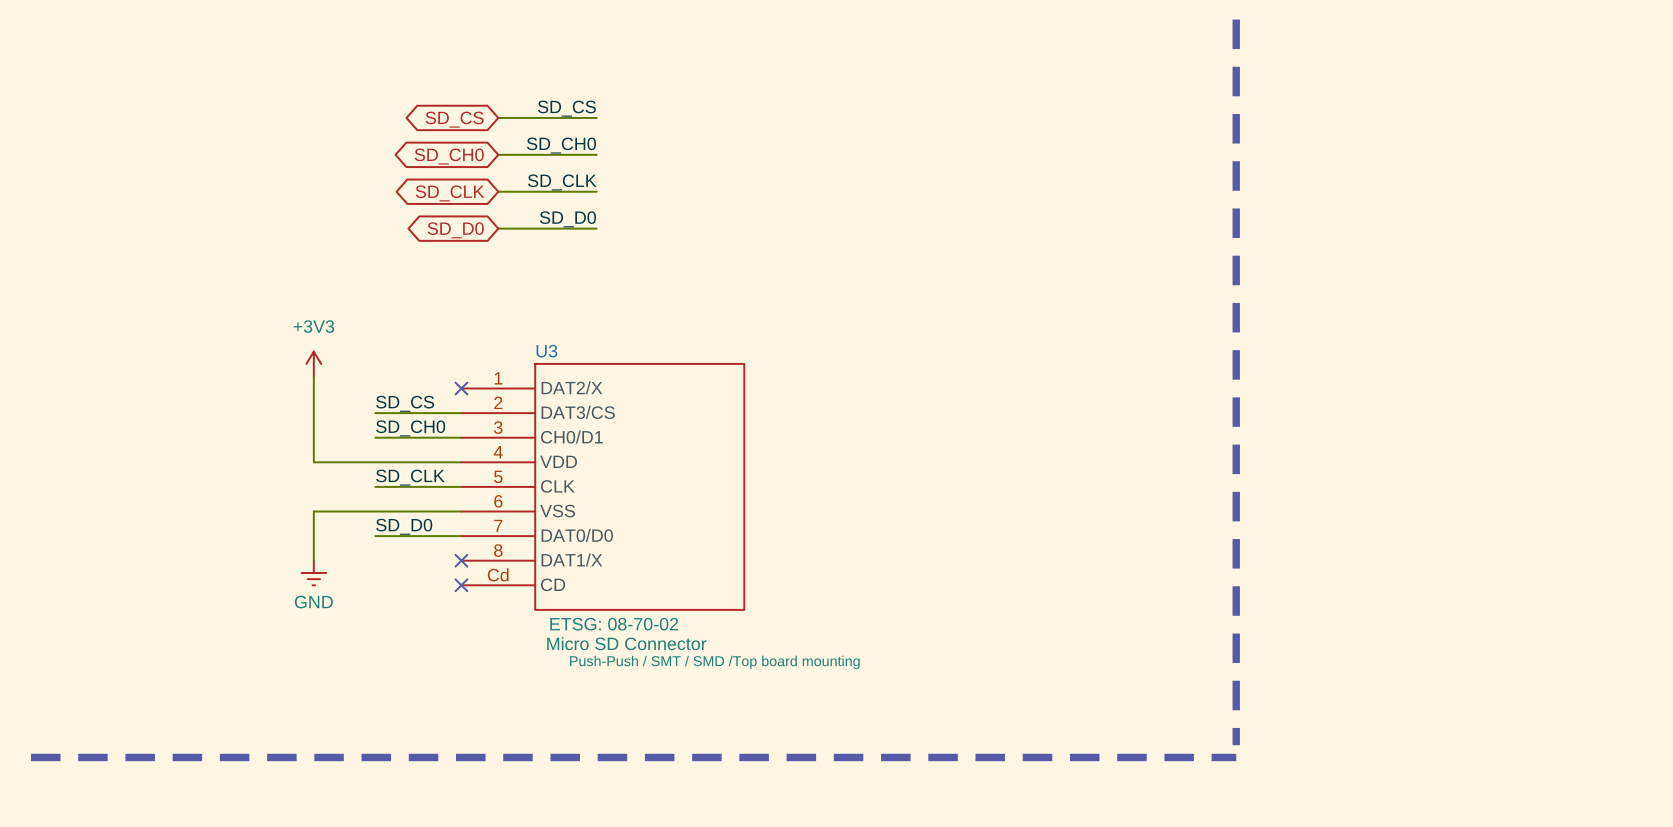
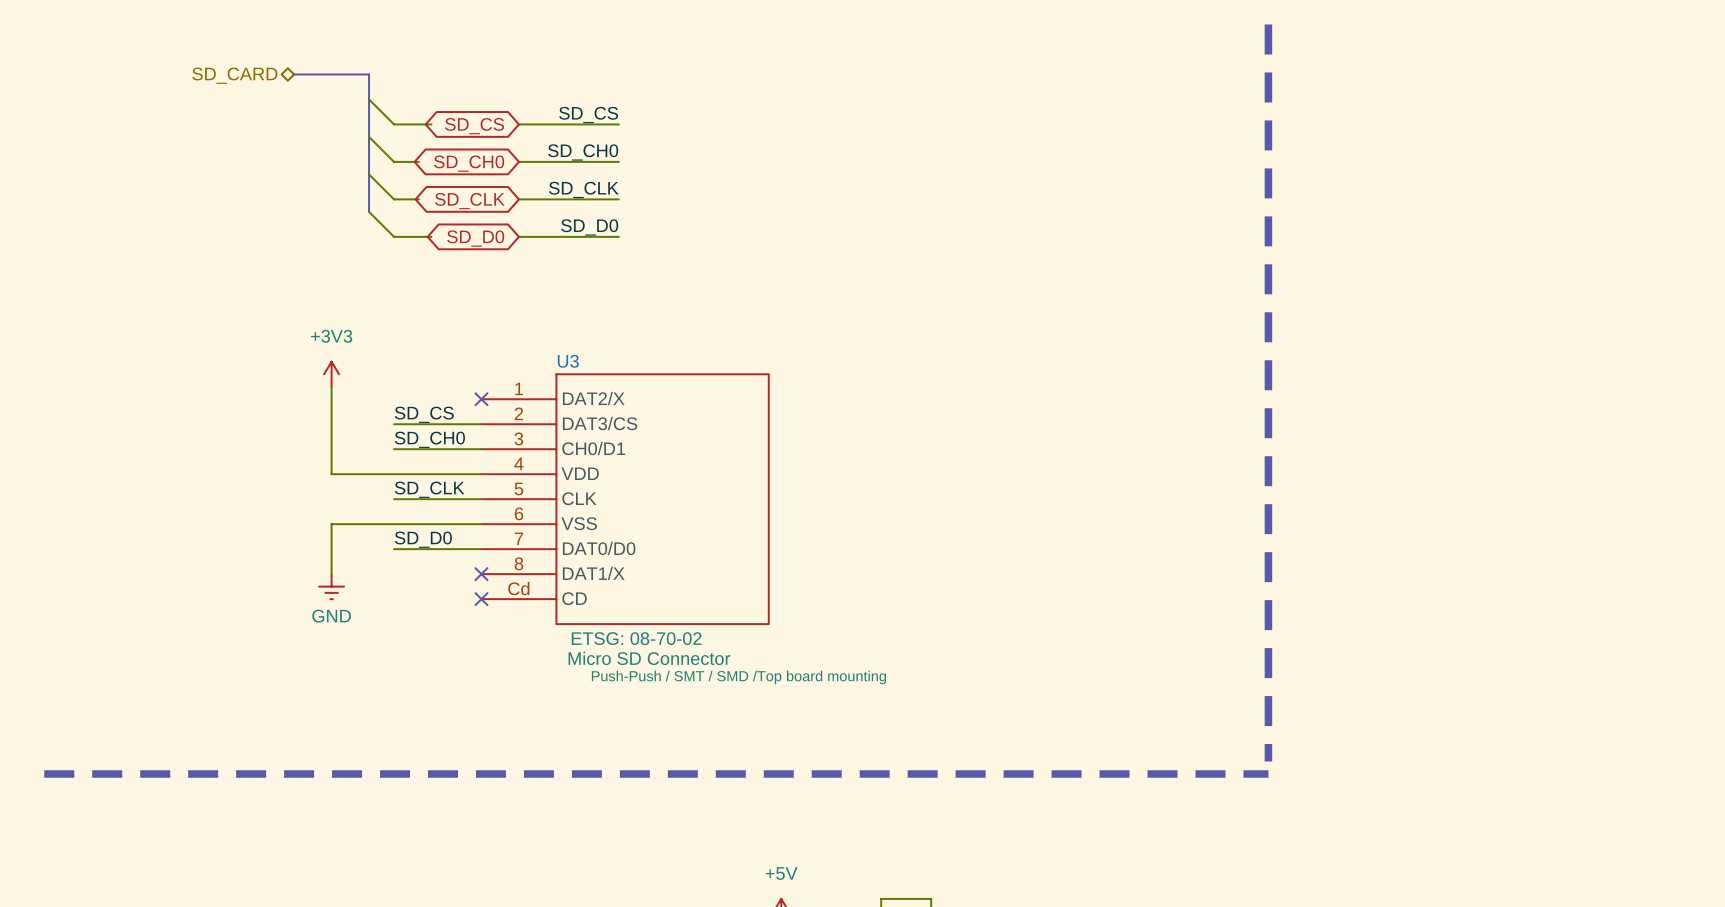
bus: none -> (294, 74) (369, 74) (369, 211)
hierarchical label: none -> SD_CARD (234, 75)
wire: none -> (369, 99) (394, 124) (431, 124)
wire: none -> (369, 136) (394, 161) (419, 161)
wire: none -> (369, 174) (394, 199) (419, 199)
wire: none -> (369, 211) (394, 236) (431, 236)

